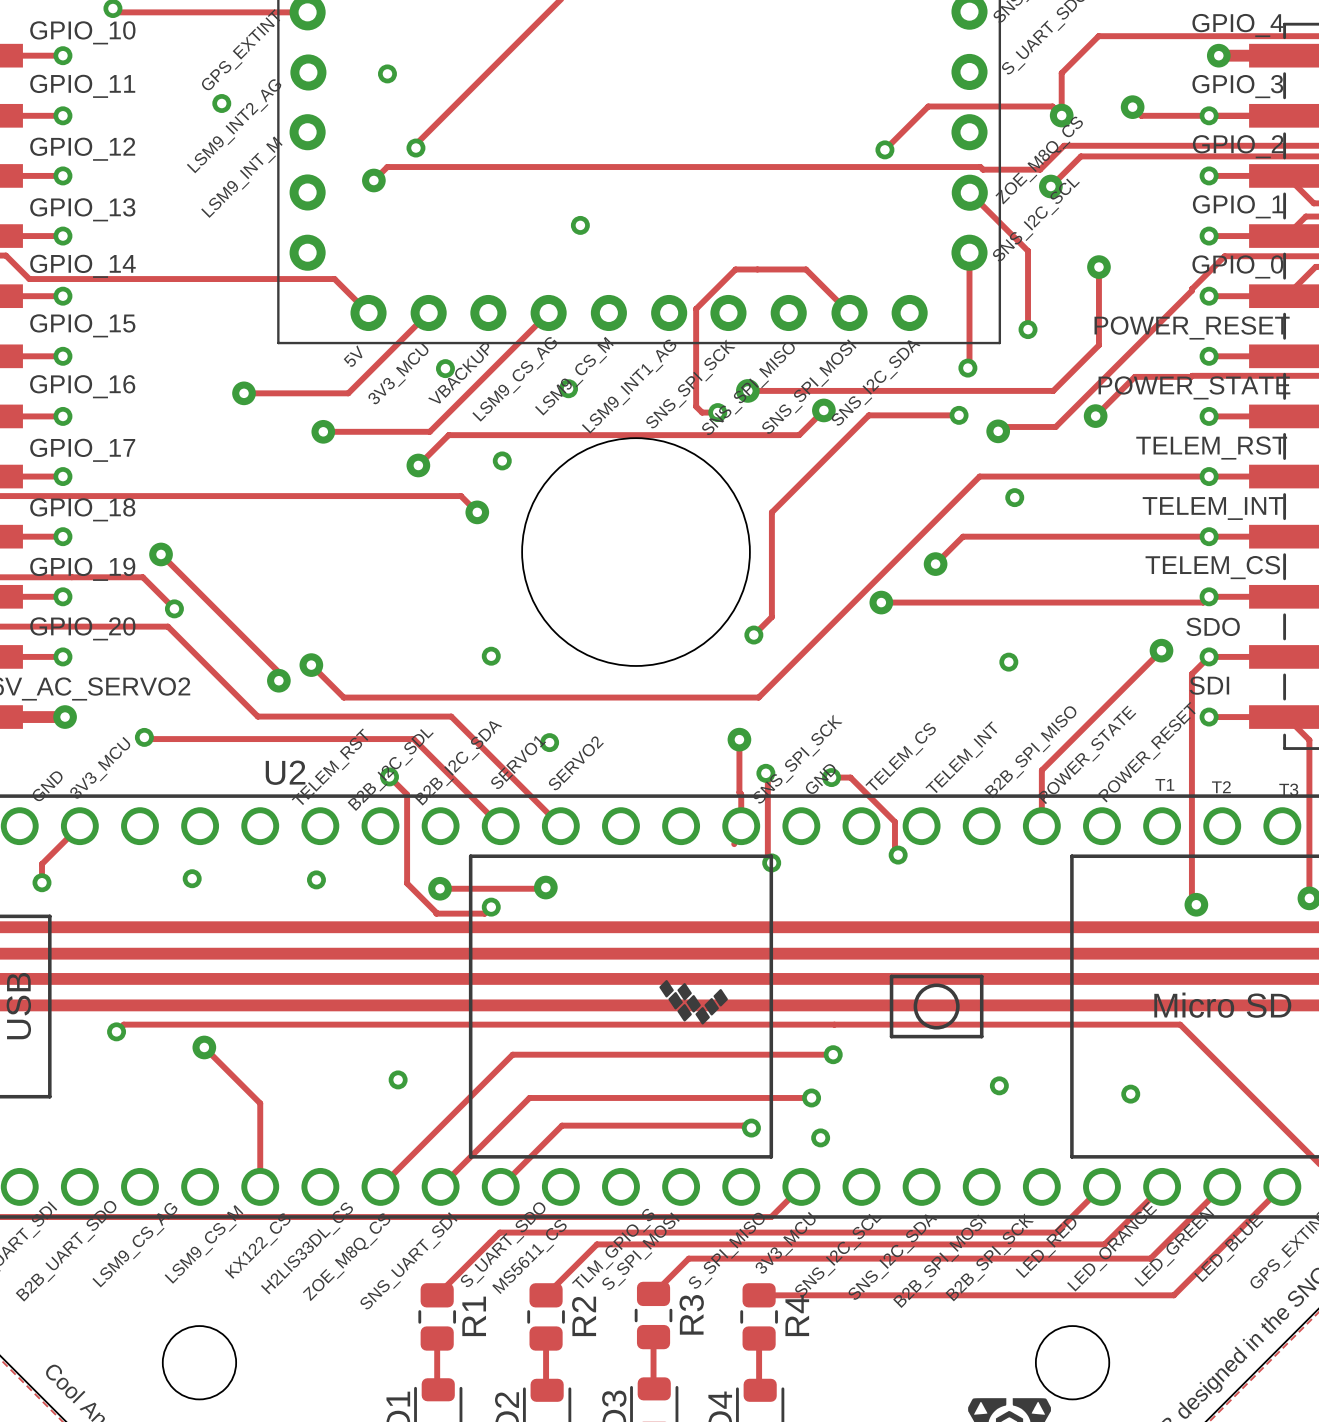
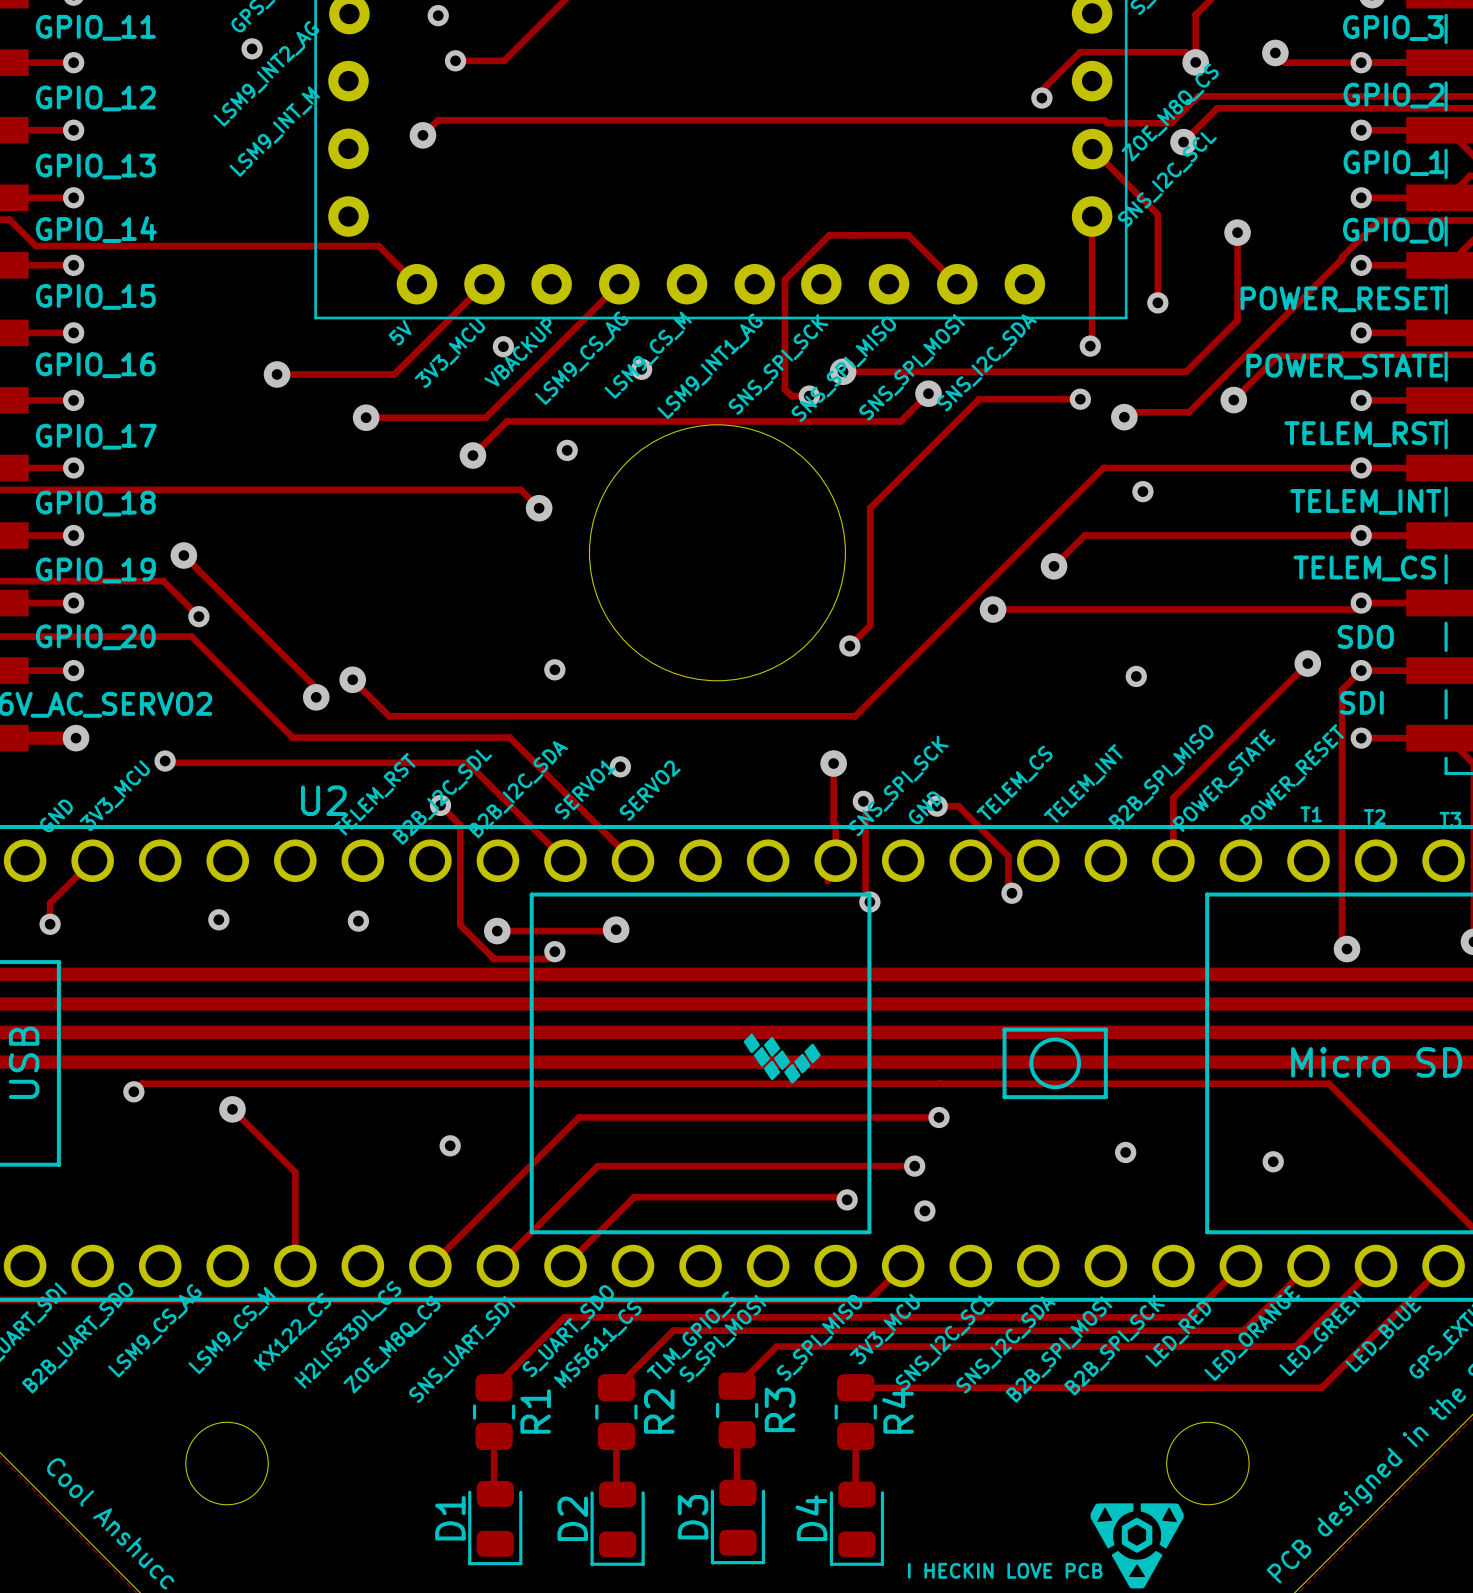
track: (958, 106) (928, 106) (884, 149) -> (1080, 52) (1041, 90) (1041, 98)
track: (446, 114) (415, 144) (415, 148) -> (504, 60) (455, 60)
via position: (415, 148) -> (455, 60)
via position: (884, 149) -> (1041, 98)
via: (580, 225) -> none

